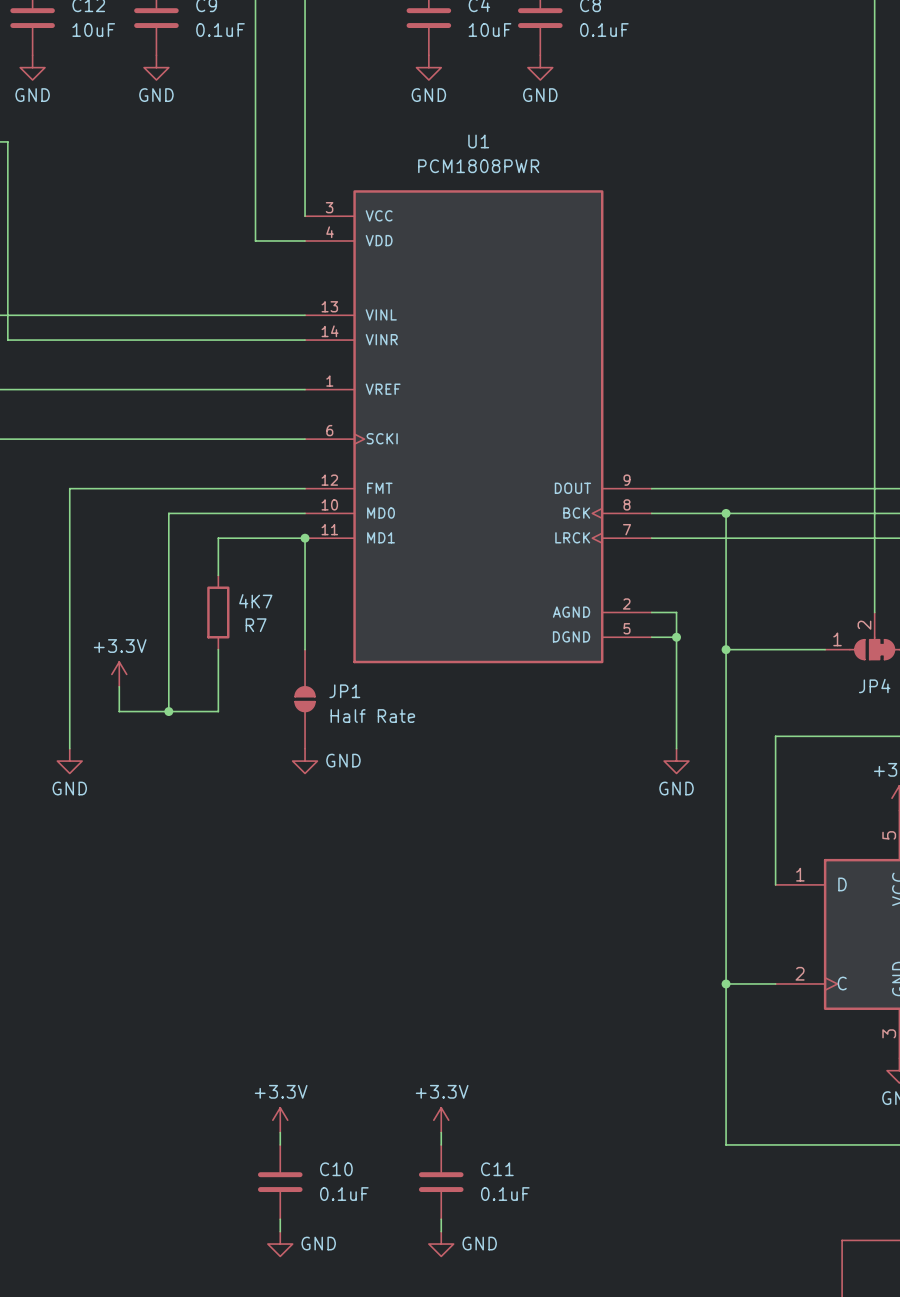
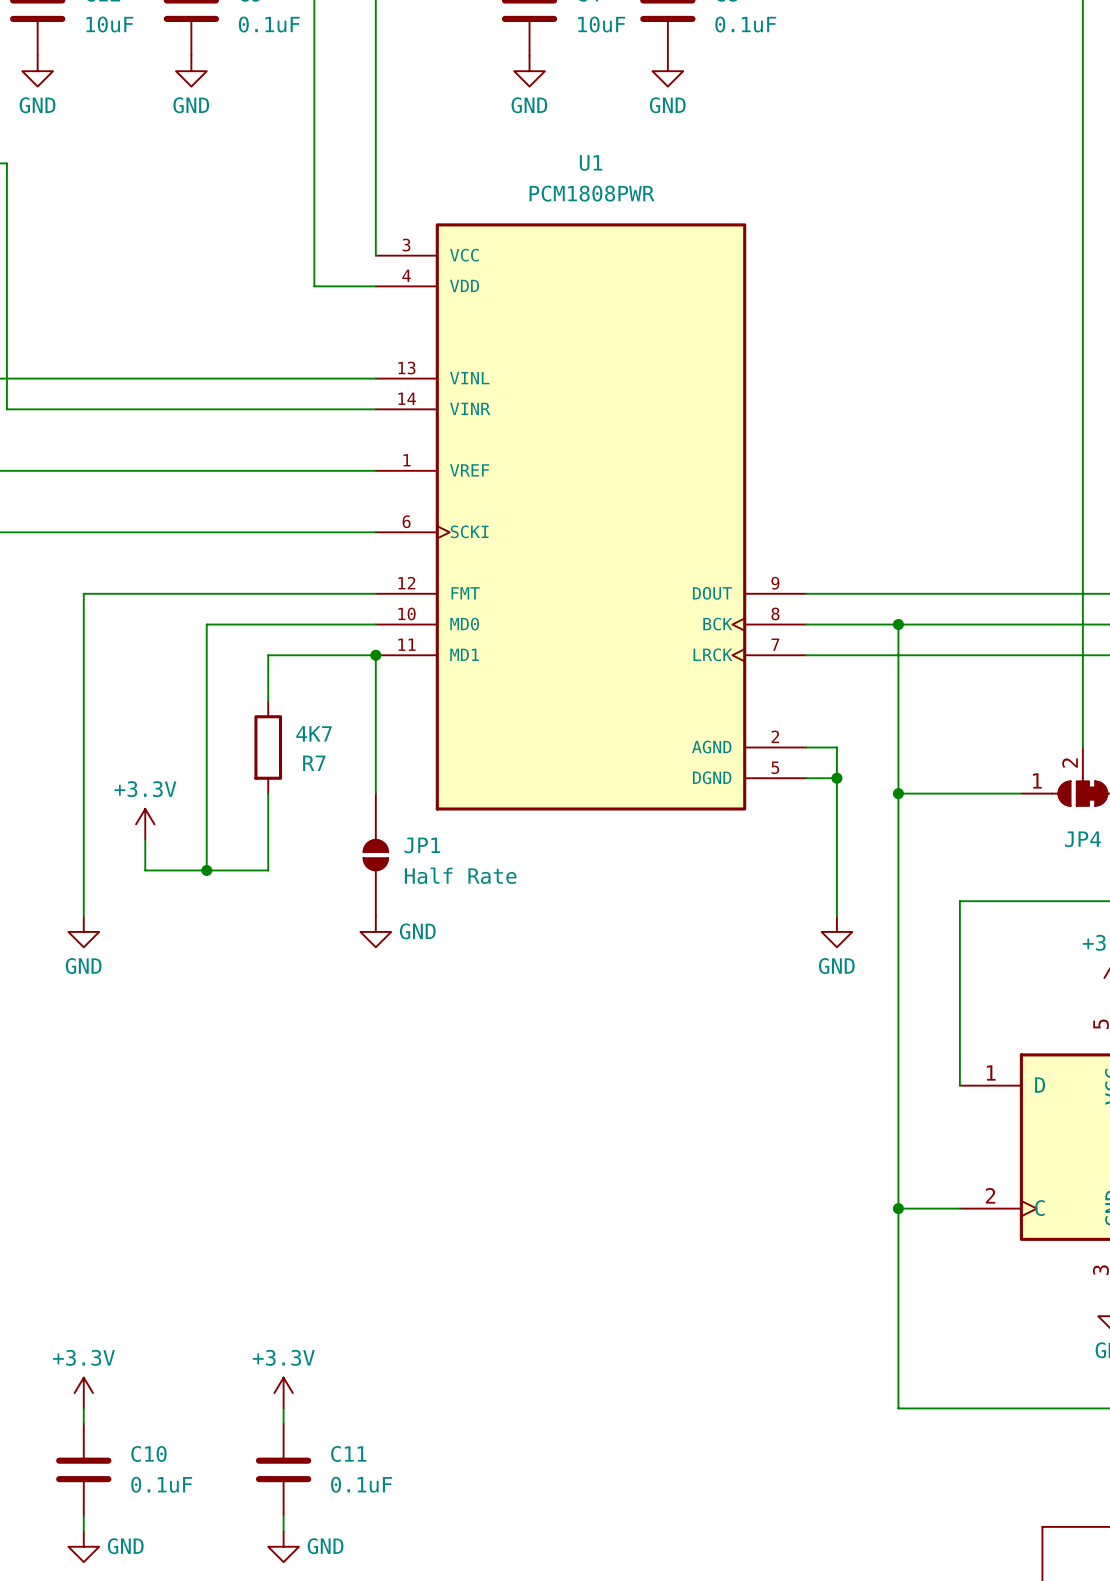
power symbol position: +3.3V (280, 1120) -> +3.3V (283, 1393)
power symbol: +3.3V (441, 1120) -> none
power symbol: none -> +3.3V (83, 1393)
wire: (280, 1132) (280, 1144) -> (83, 1408) (83, 1423)
wire: (441, 1132) (441, 1144) -> (283, 1408) (283, 1423)
C10 position: (280, 1182) -> (83, 1469)
C11 position: (441, 1182) -> (283, 1469)
wire: (280, 1219) (280, 1231) -> (83, 1516) (83, 1531)
wire: (441, 1219) (441, 1231) -> (283, 1516) (283, 1531)
power symbol position: GND (280, 1244) -> GND (283, 1546)
power symbol: GND (441, 1244) -> none
power symbol: none -> GND (83, 1546)

